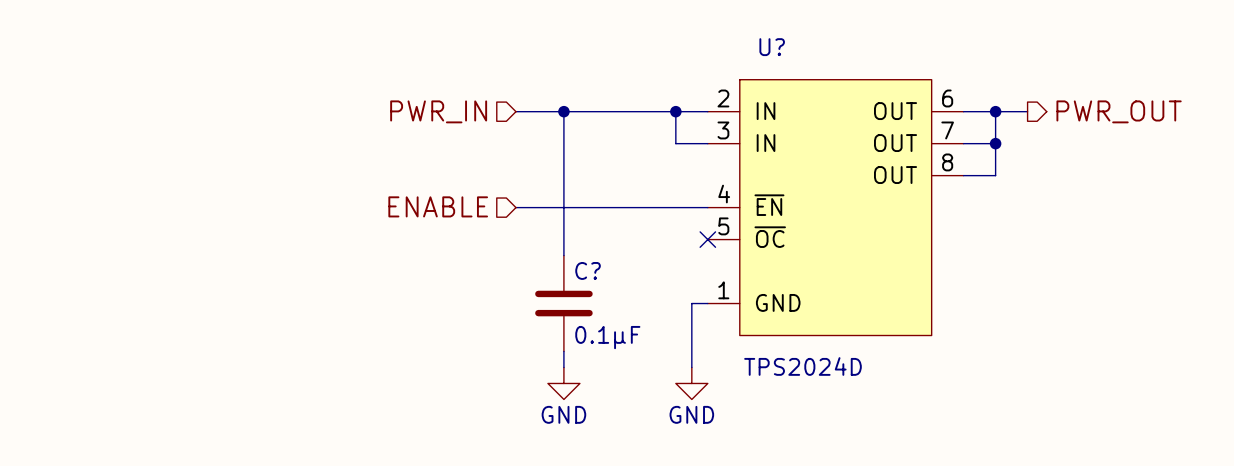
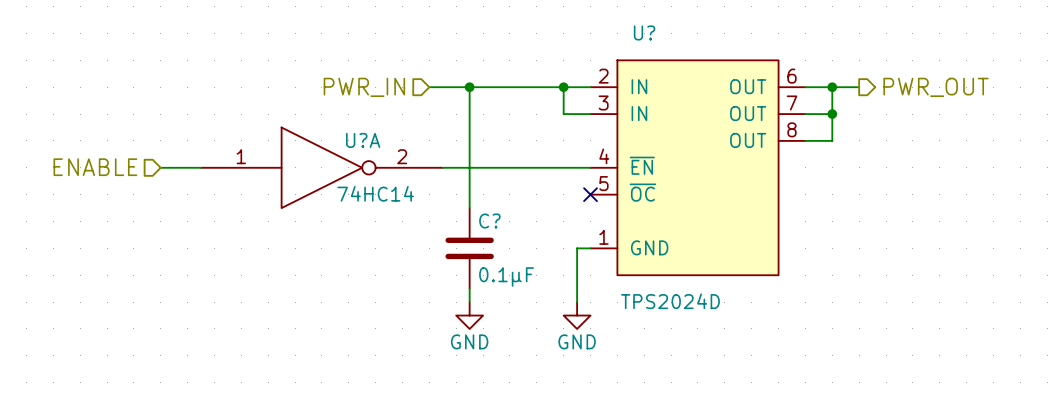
hierarchical label: none -> ENABLE (95, 167)
hierarchical label: ENABLE (438, 206) -> none
wire: none -> (160, 167) (201, 167)
U?A: none -> 74HC14 (321, 167)

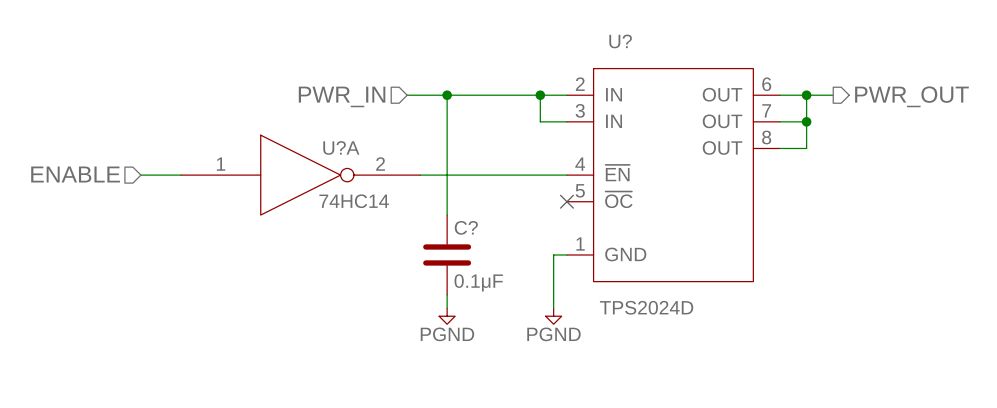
power symbol: GND (469, 315) -> PGND (447, 316)
power symbol: GND (577, 315) -> PGND (553, 316)

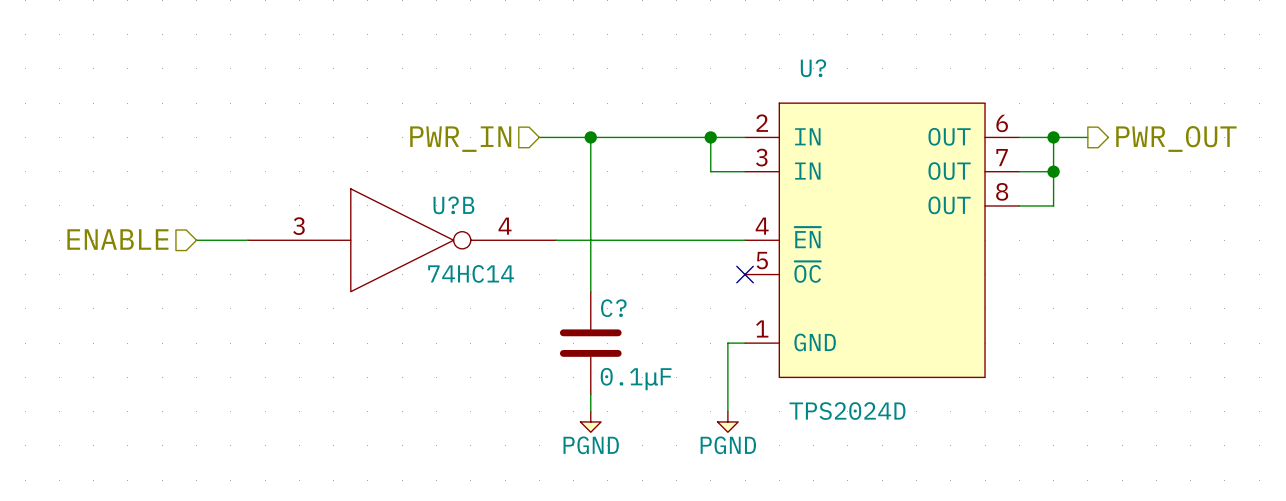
U?A name: U?A (341, 147) -> U?B (453, 205)
U?A pin number: 1 (221, 164) -> 3 (298, 226)
U?A pin number: 2 (380, 164) -> 4 (505, 226)

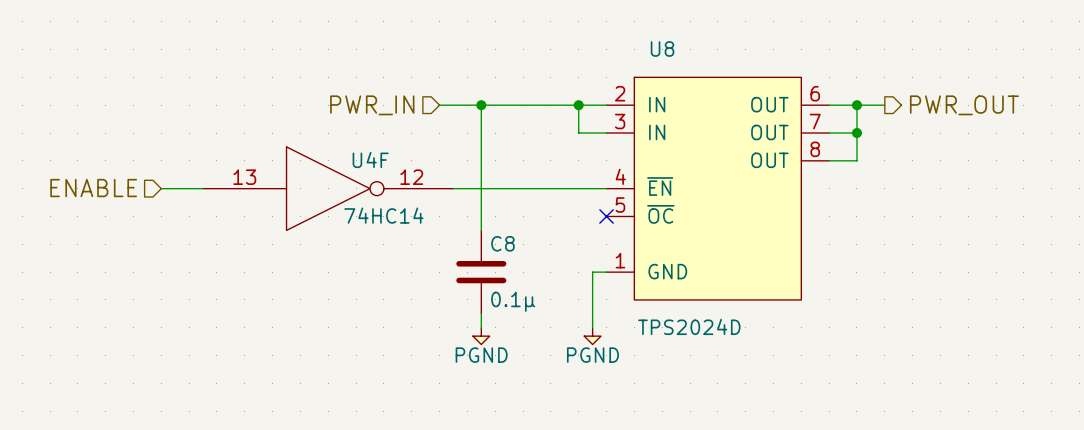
U? name: U? (813, 68) -> U8 (662, 49)
U?B name: U?B (453, 205) -> U4F (370, 159)
U?B pin number: 3 (298, 226) -> 13 (244, 177)
U?B pin number: 4 (505, 226) -> 12 (411, 177)
C? name: C? (613, 308) -> C8 (502, 243)
C? value: 0.1μF (636, 379) -> 0.1μ (513, 301)

